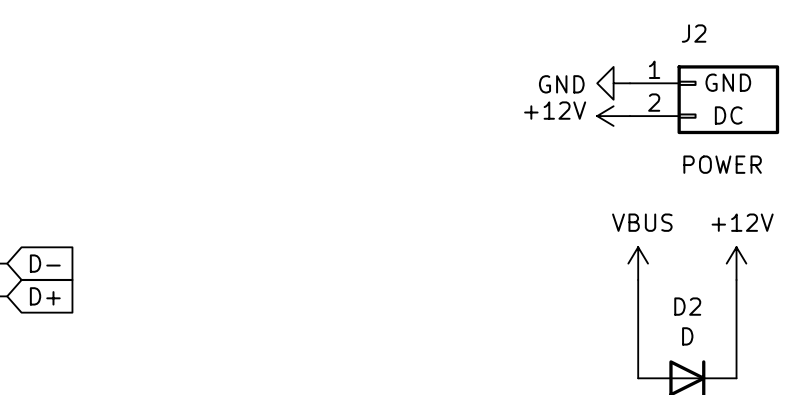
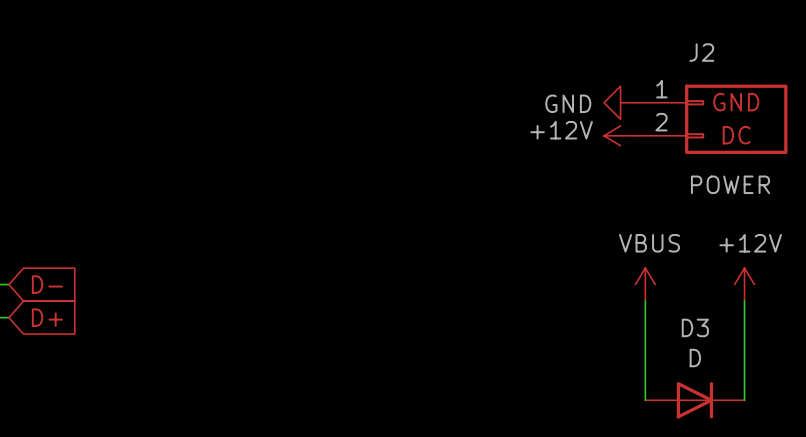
D2 name: D2 (687, 306) -> D3 (695, 327)

